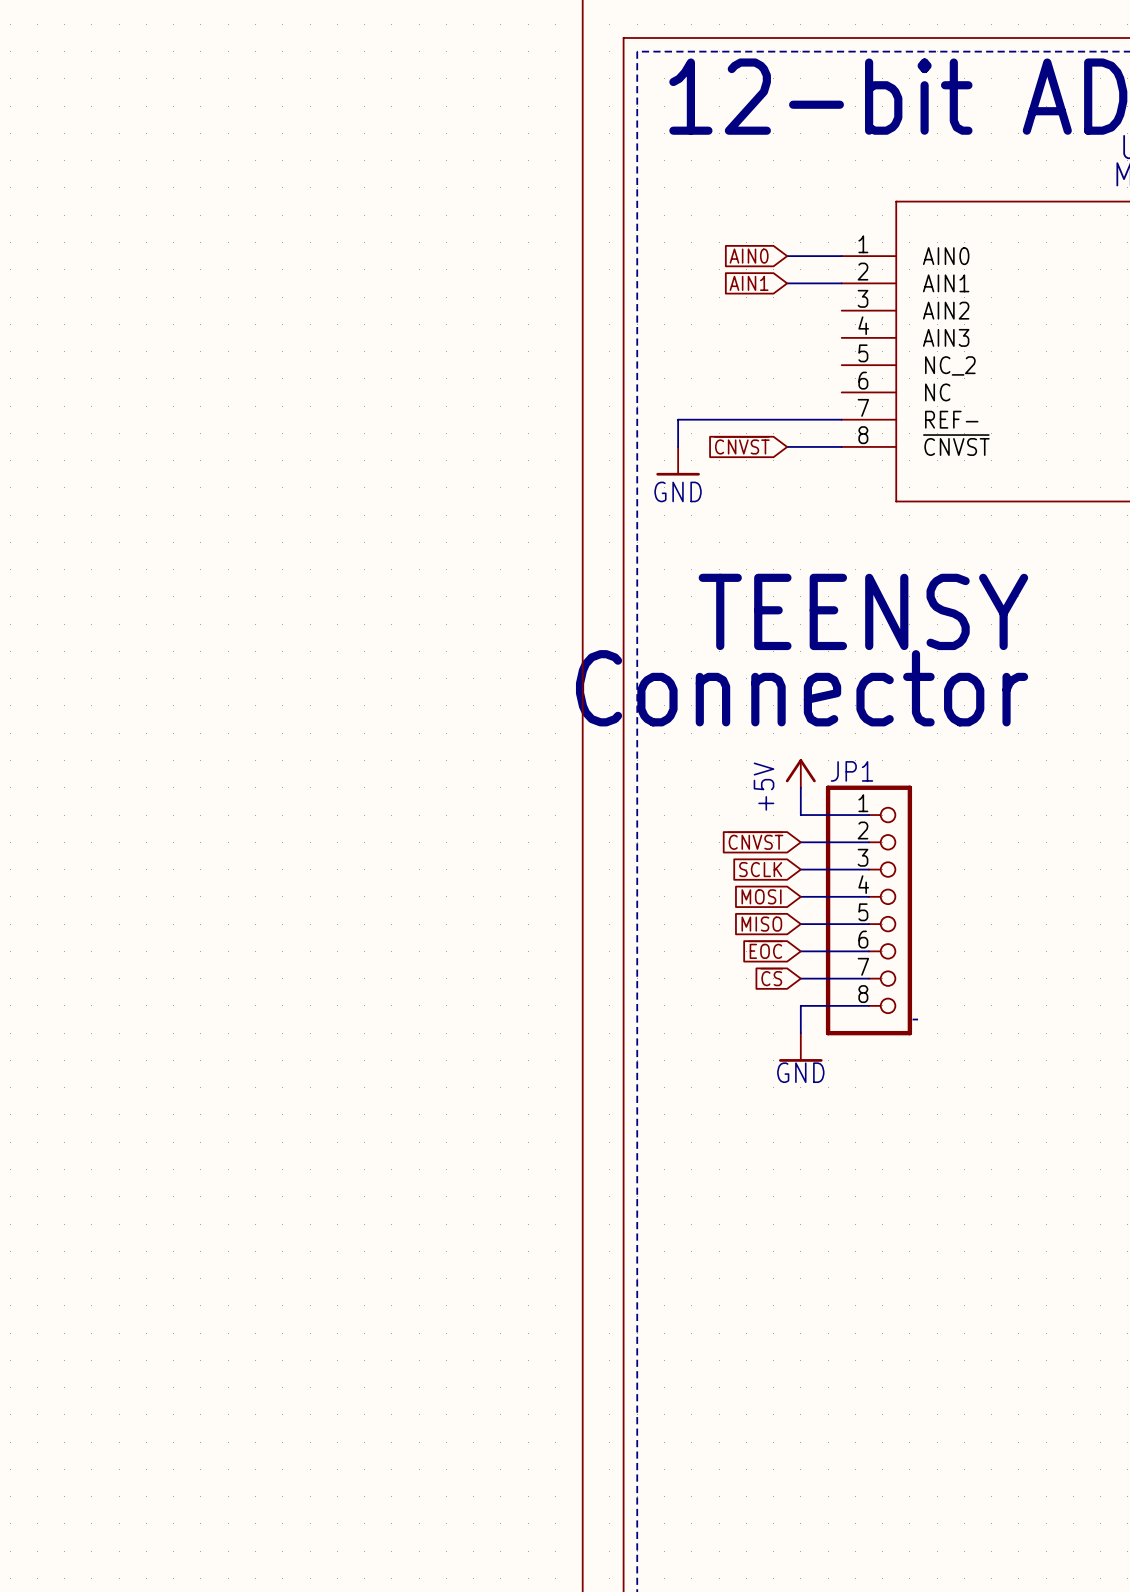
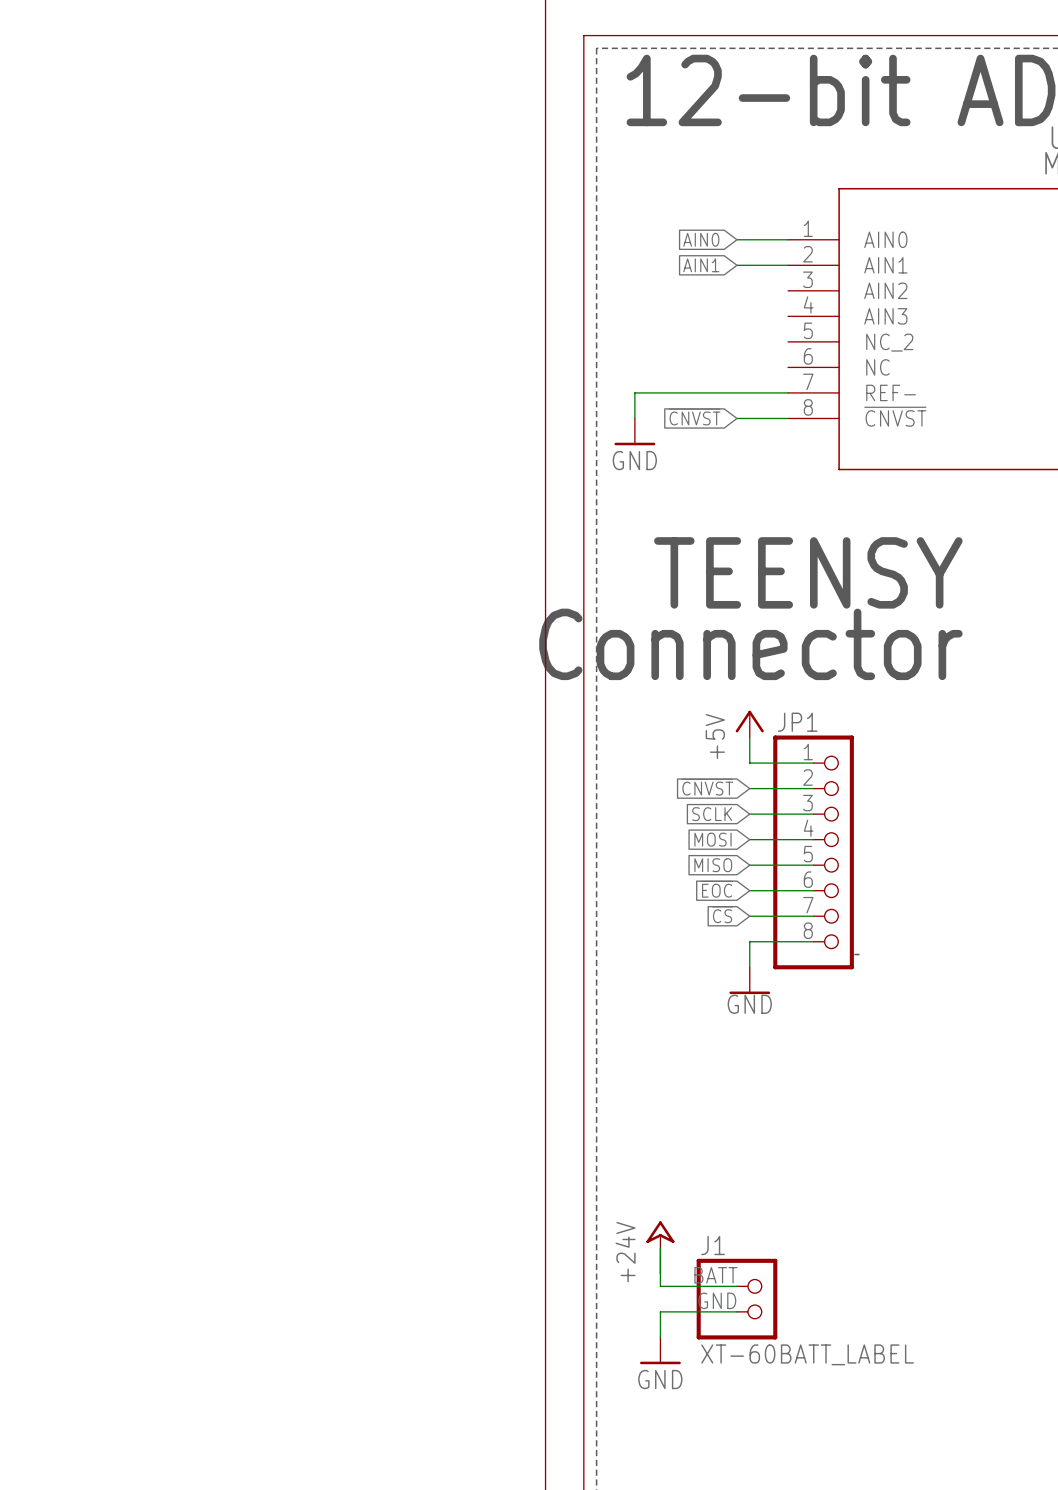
power symbol: none -> +24V (660, 1241)
wire: none -> (660, 1248) (660, 1286) (736, 1286)
J1: none -> XT-60BATT_LABEL (736, 1299)
wire: none -> (736, 1311) (660, 1311) (660, 1337)
power symbol: none -> GND (660, 1350)

